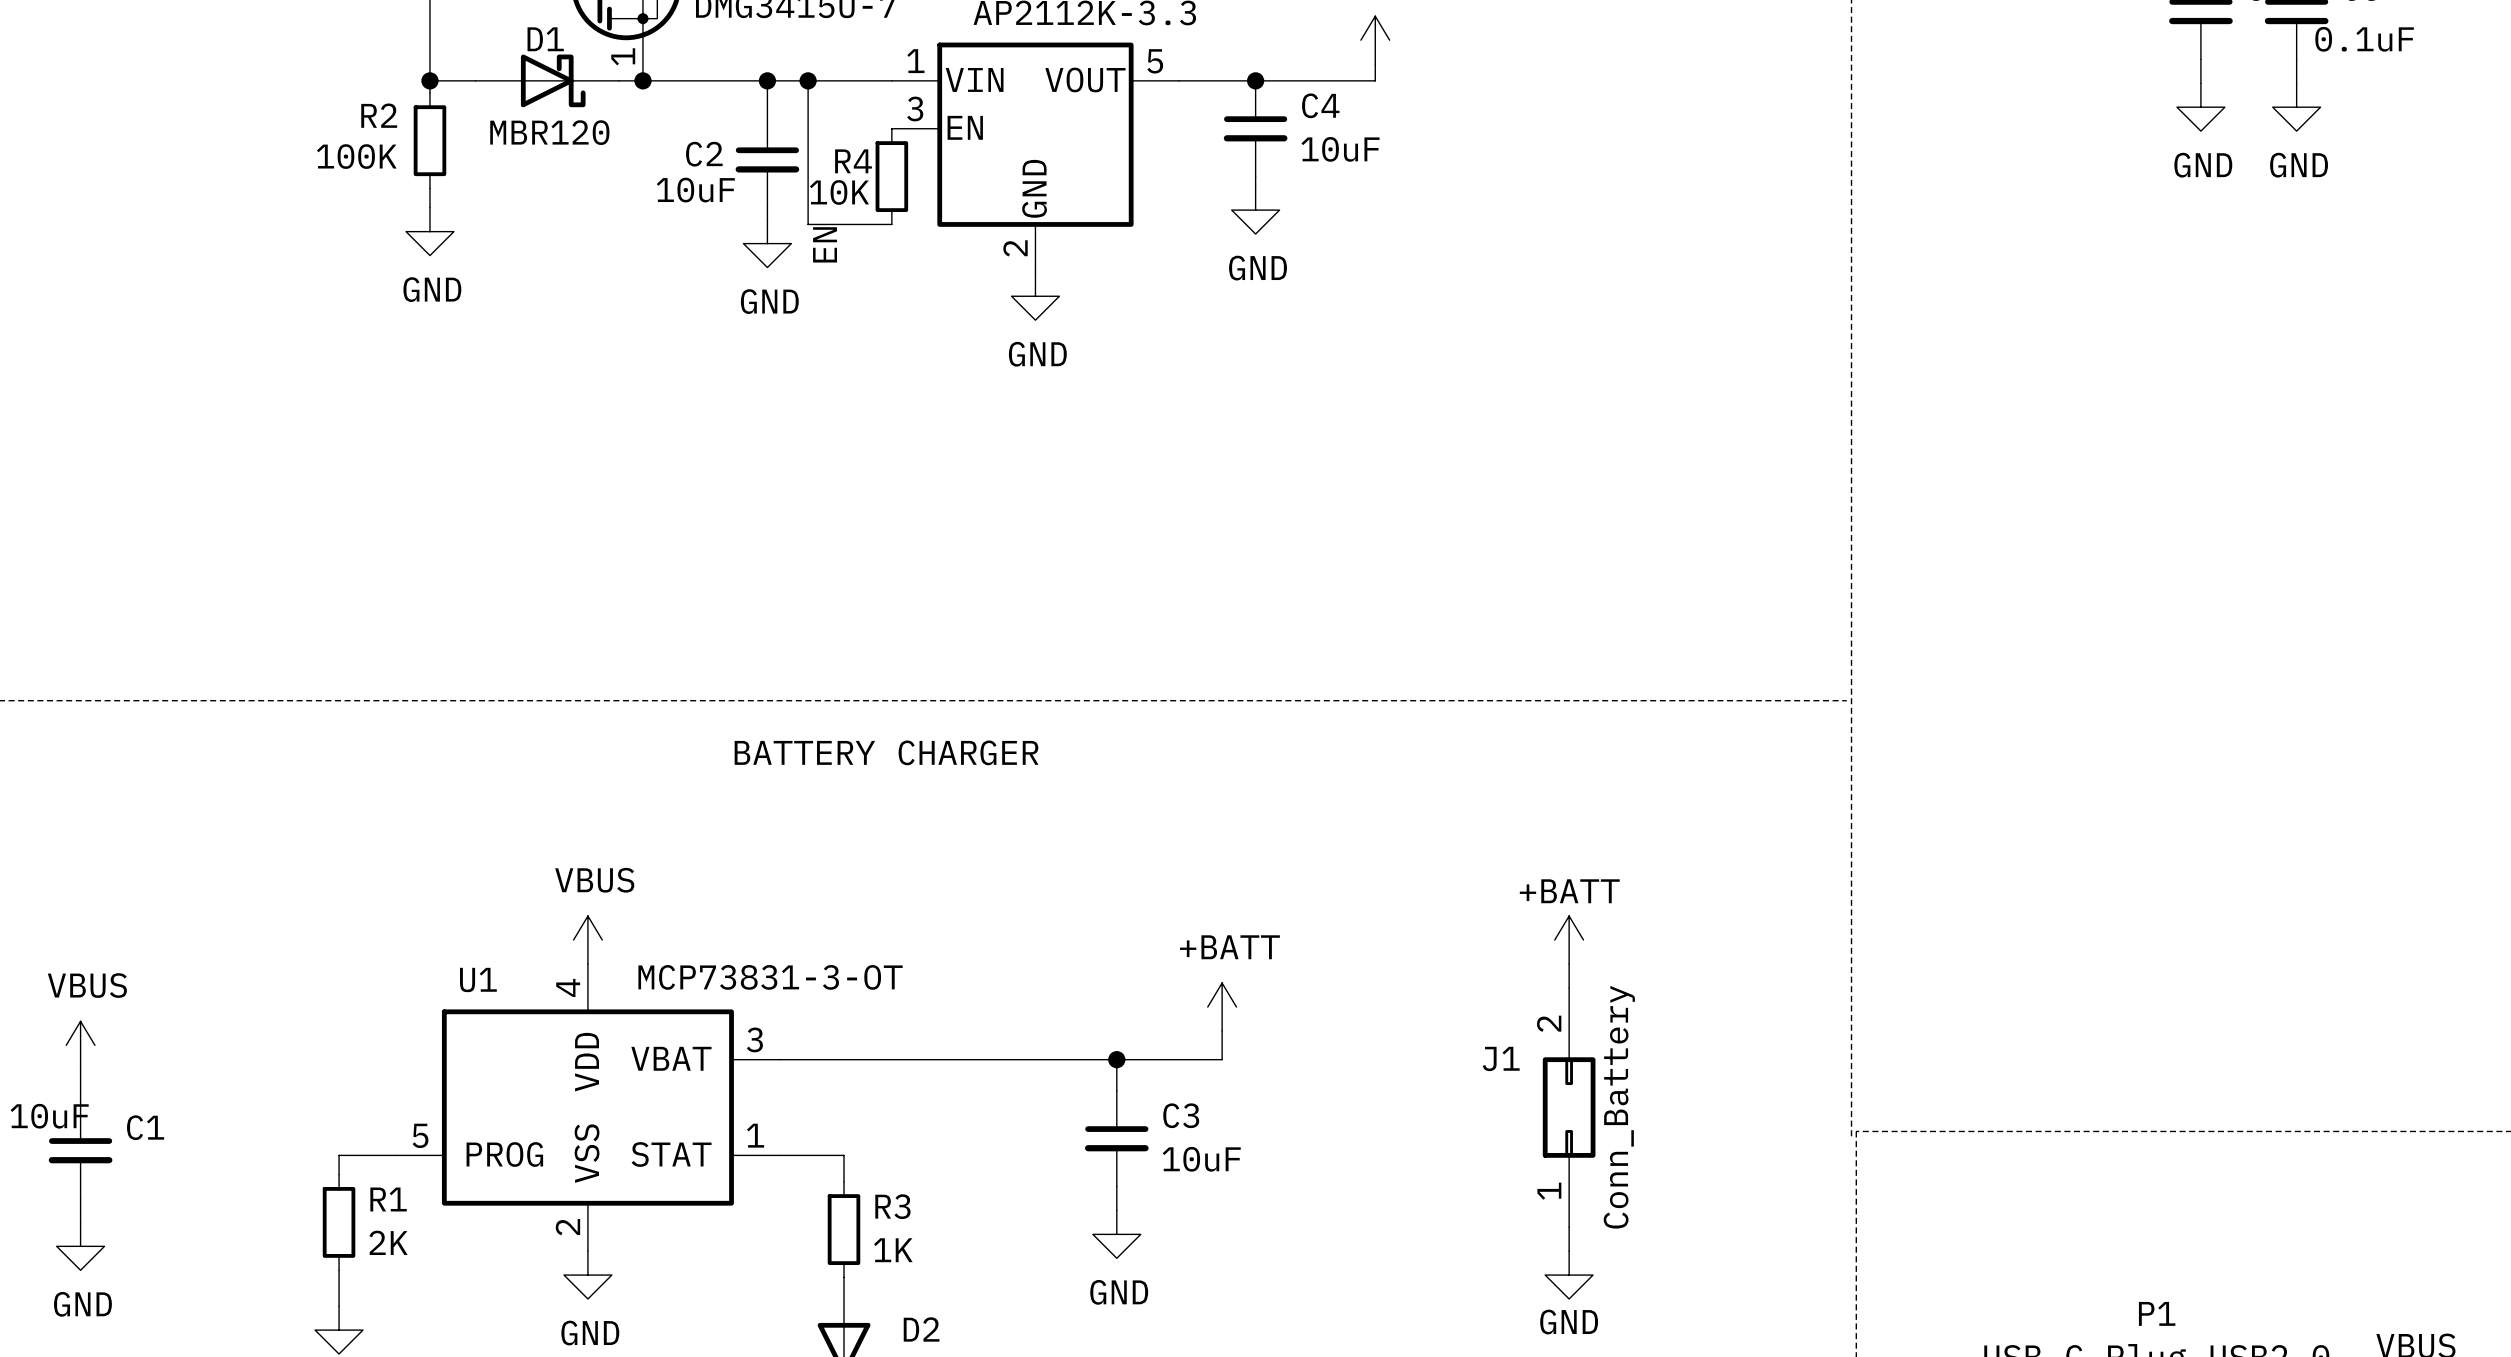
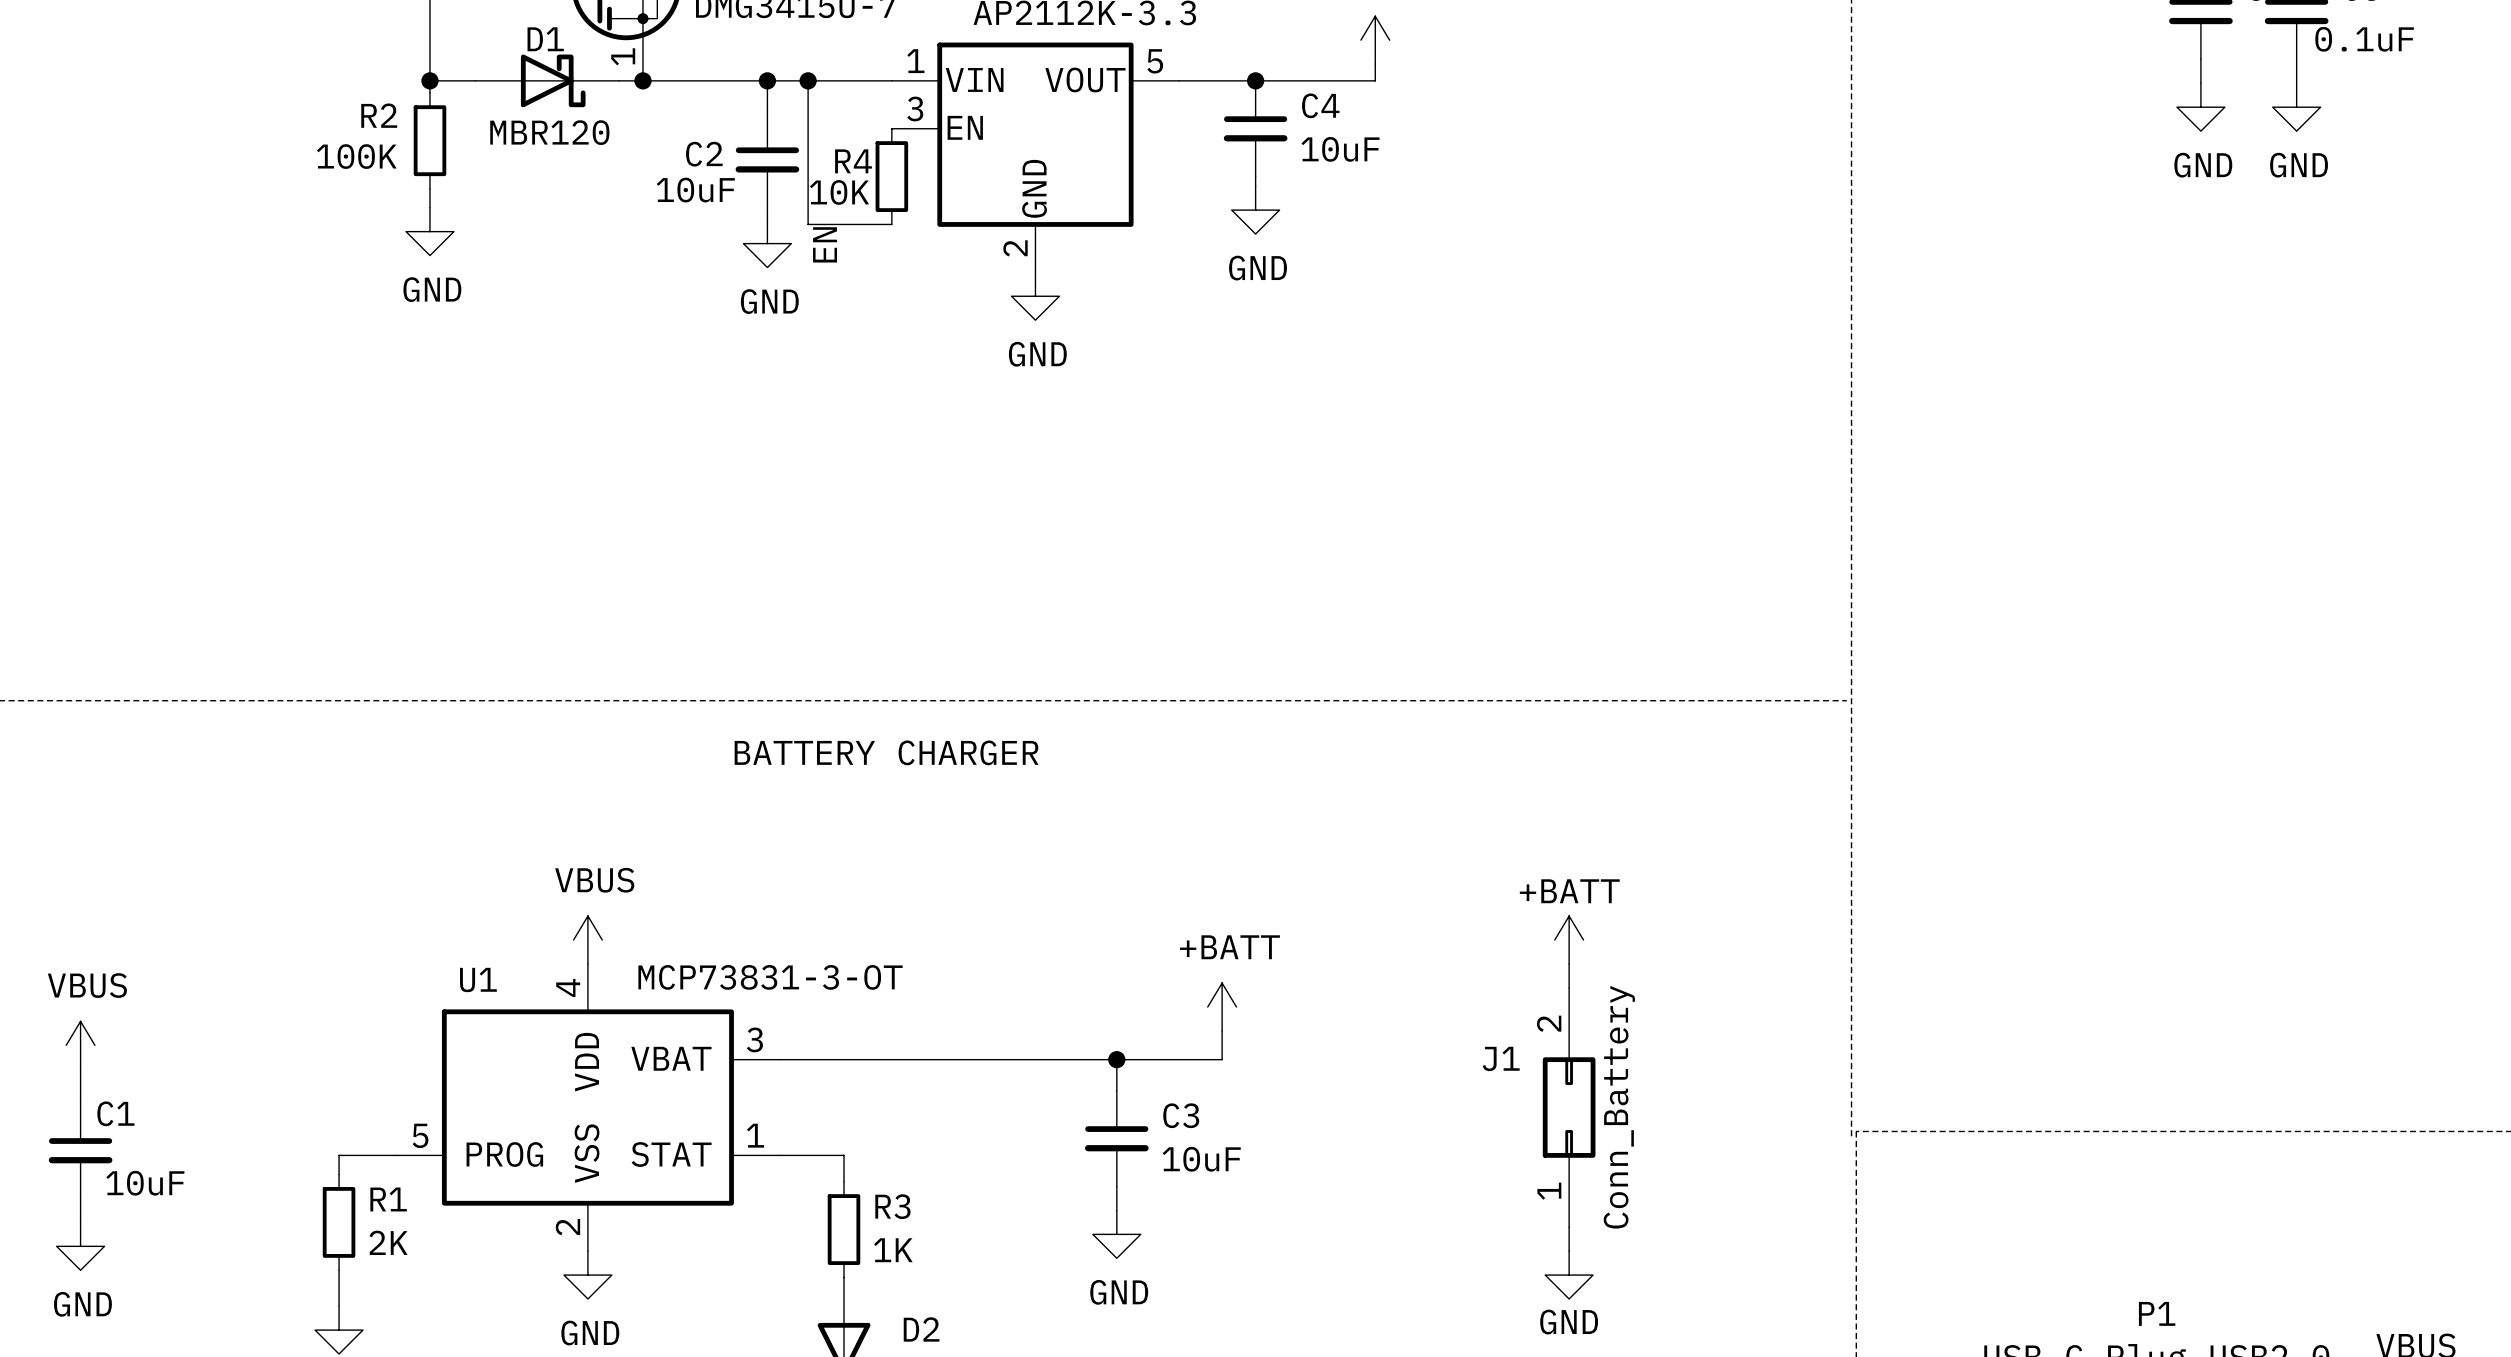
C1 value position: 10uF (49, 1116) -> 10uF (145, 1183)
C1 name position: C1 (145, 1127) -> C1 (115, 1113)

